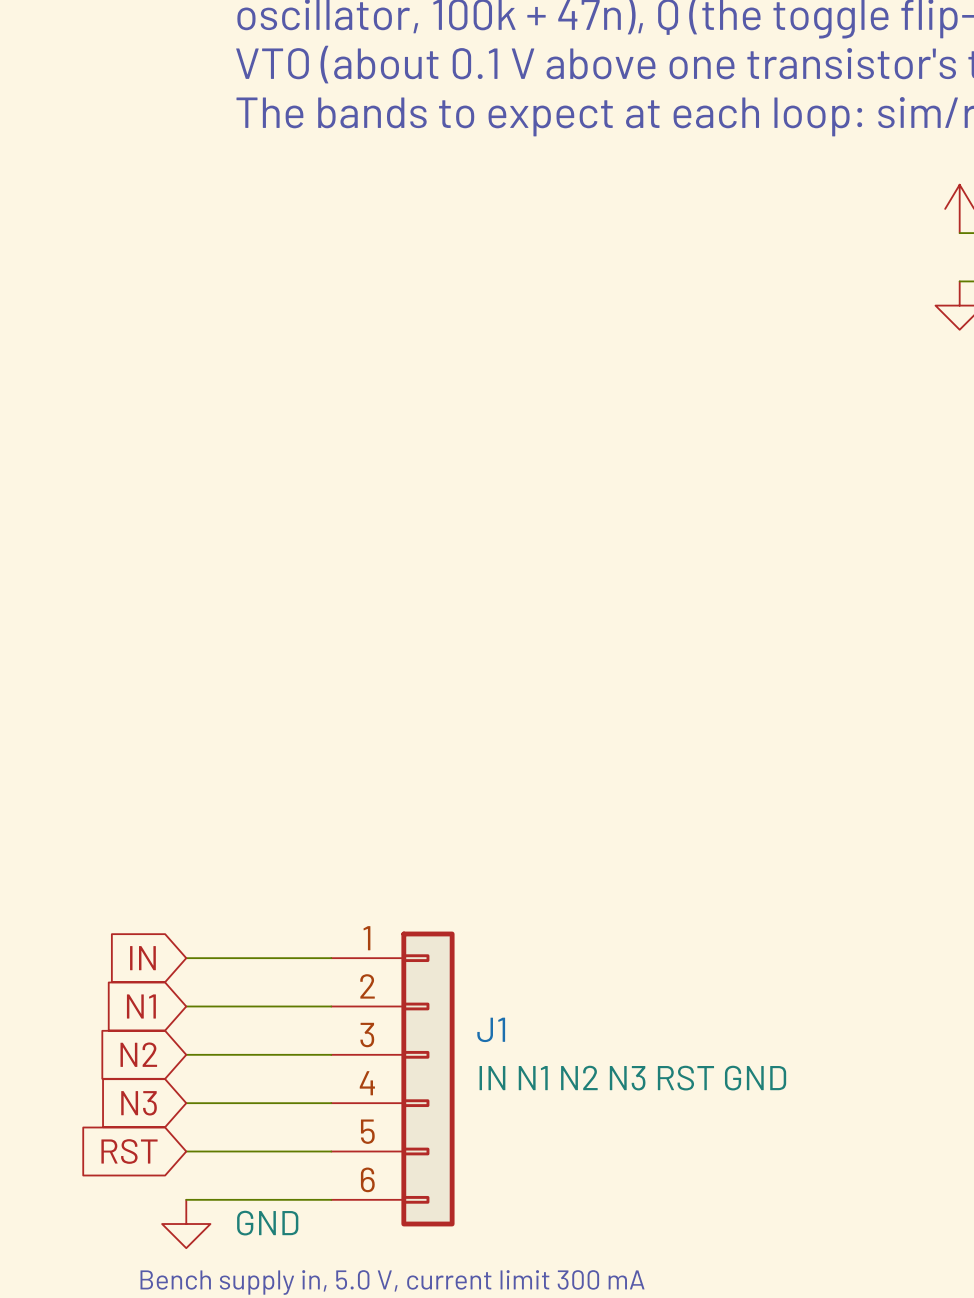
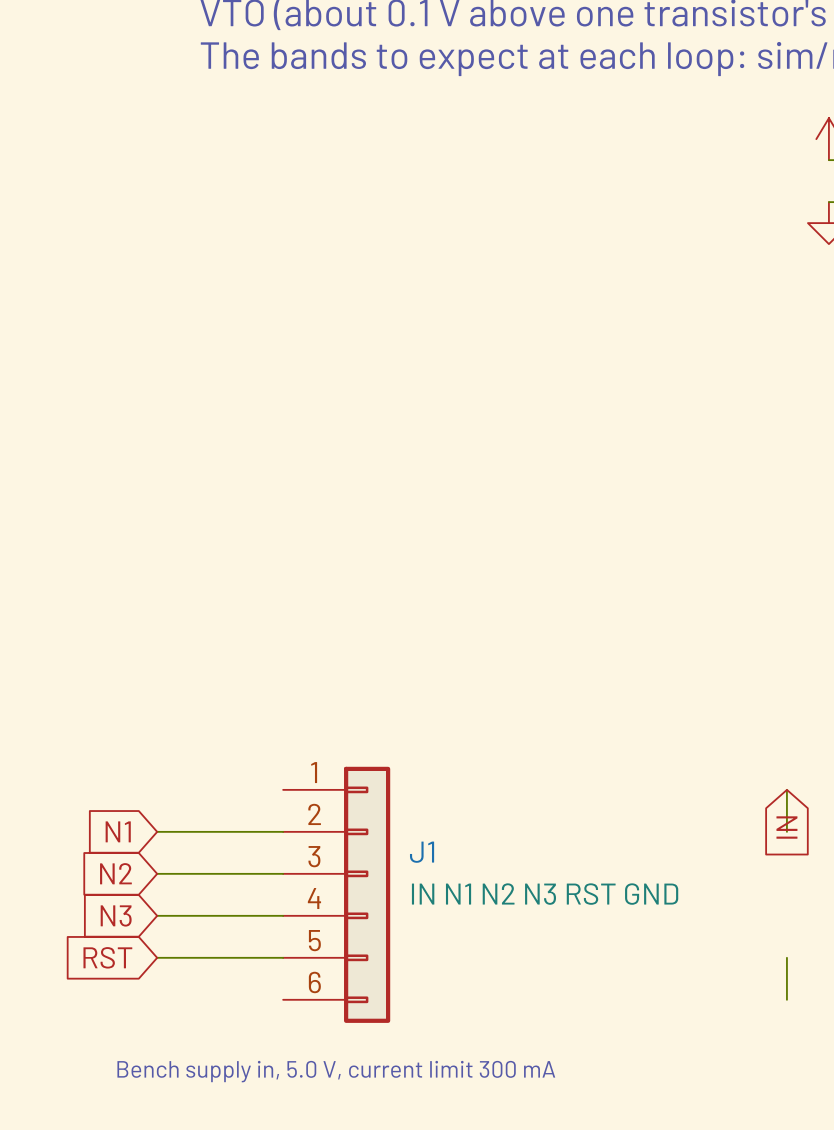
global label: IN (142, 958) -> none
wire: (186, 958) (331, 958) -> none
wire: none -> (786, 789) (786, 831)
global label: none -> IN (786, 827)
wire: none -> (786, 957) (786, 999)
wire: (186, 1199) (331, 1199) -> none
power symbol: GND (186, 1224) -> none

